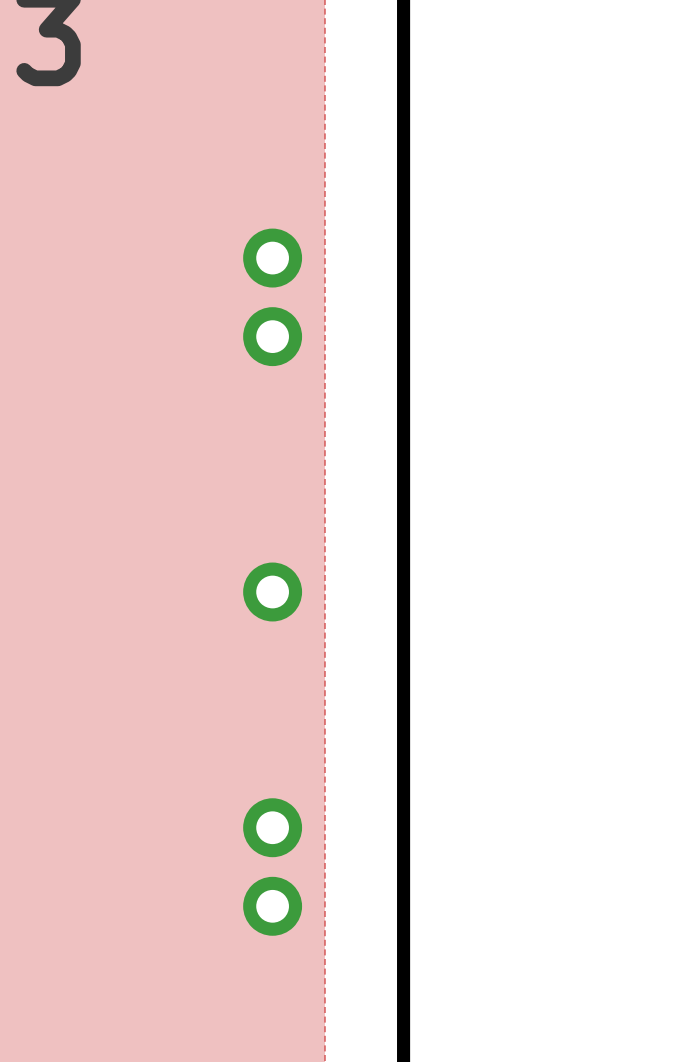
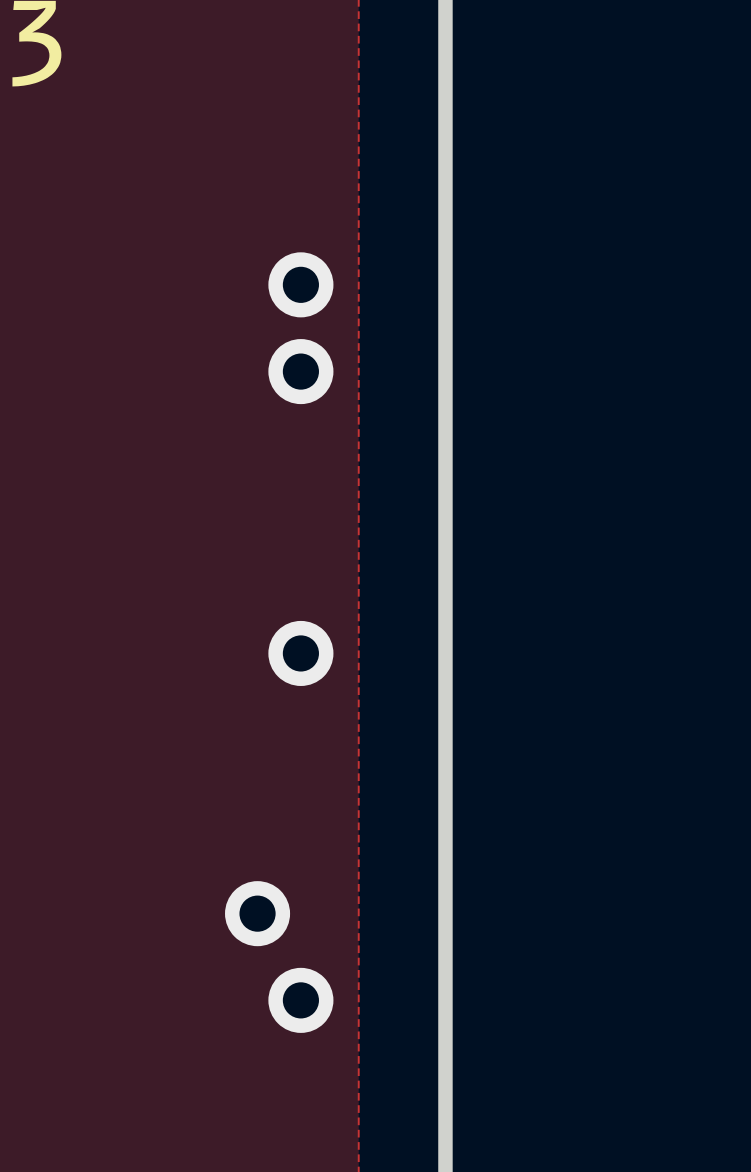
via position: (272, 827) -> (257, 913)

